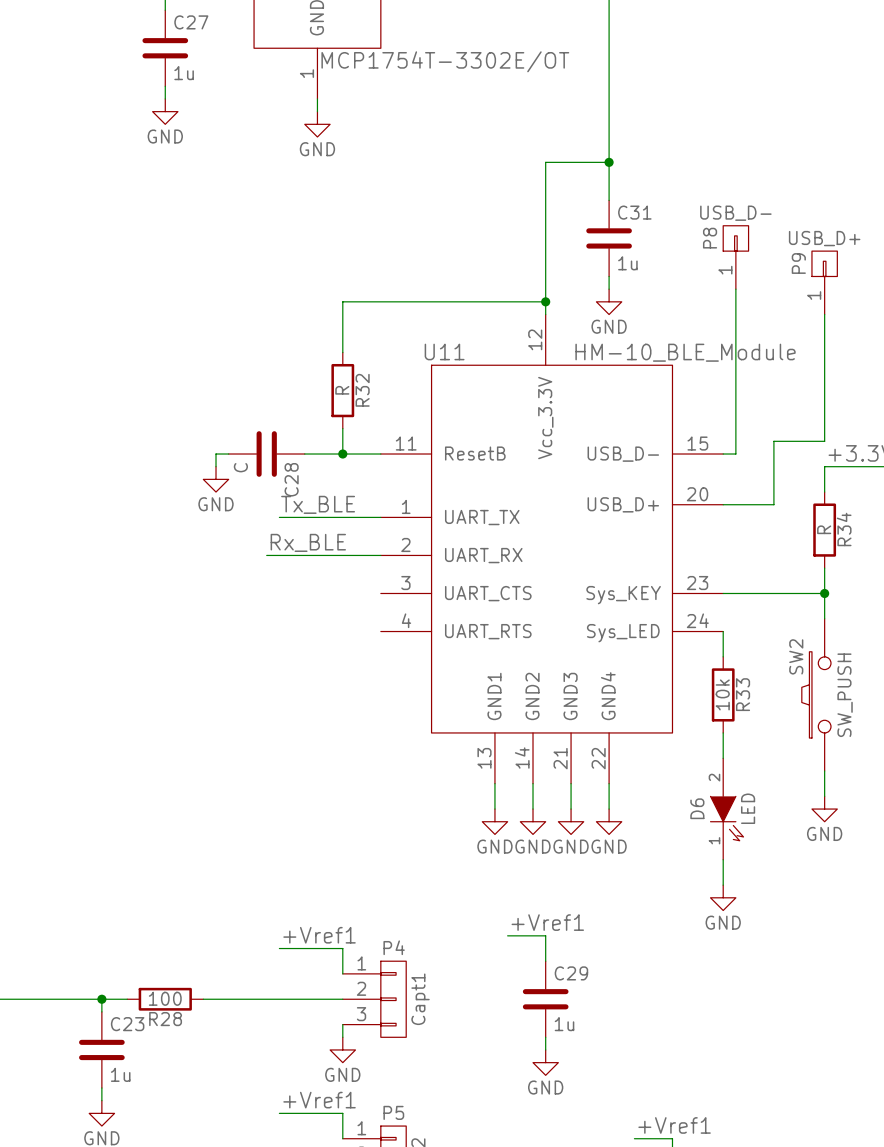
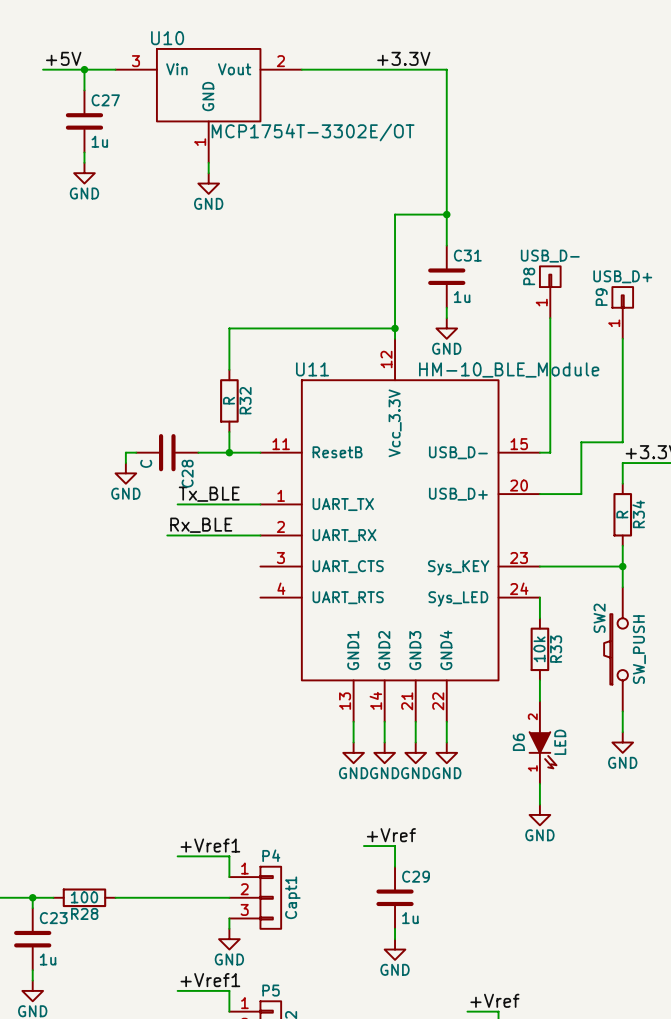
label: +Vref1 (547, 922) -> +Vref (391, 835)
label: +Vref1 (674, 1125) -> +Vref (494, 1000)

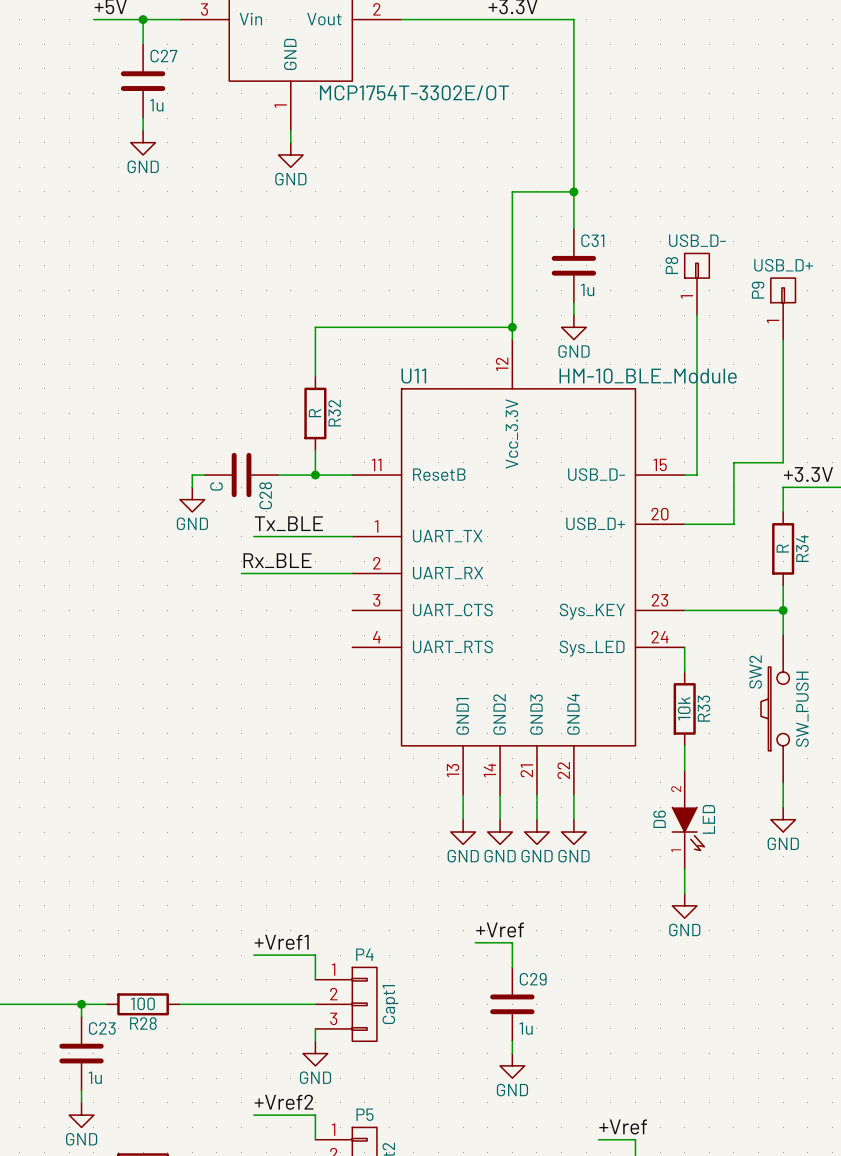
label: +Vref1 (210, 980) -> +Vref2 (284, 1102)

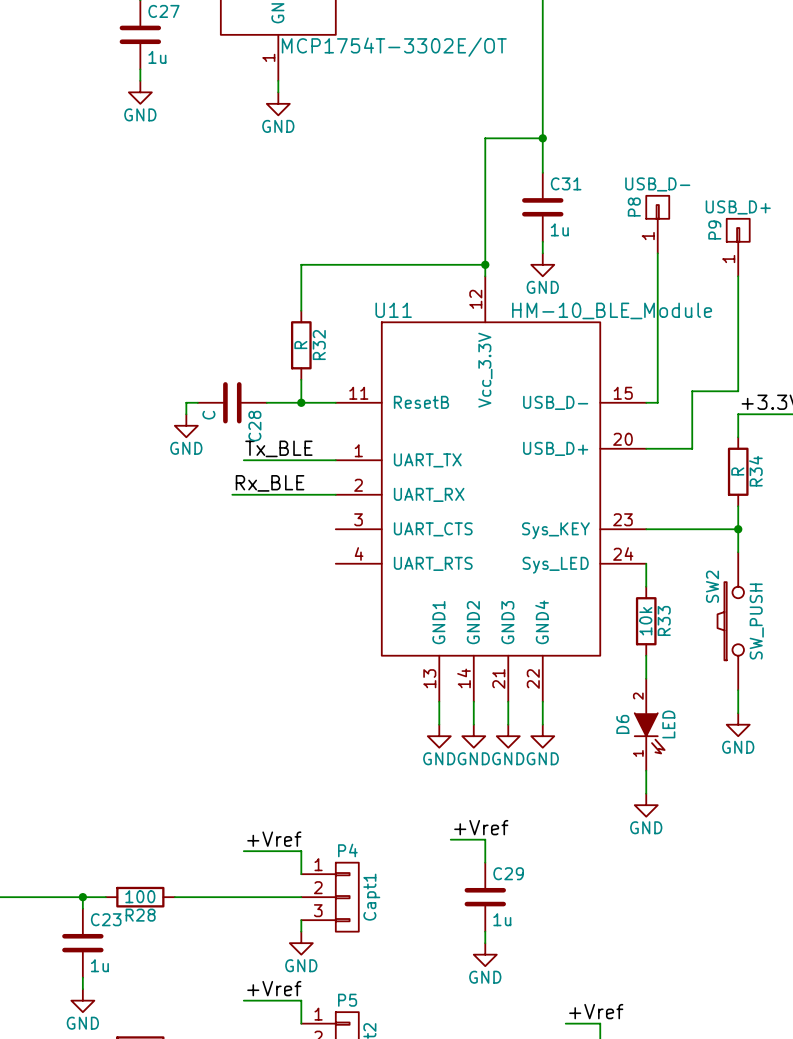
label: +Vref1 (281, 942) -> +Vref (274, 839)
label: +Vref2 (284, 1102) -> +Vref (274, 988)

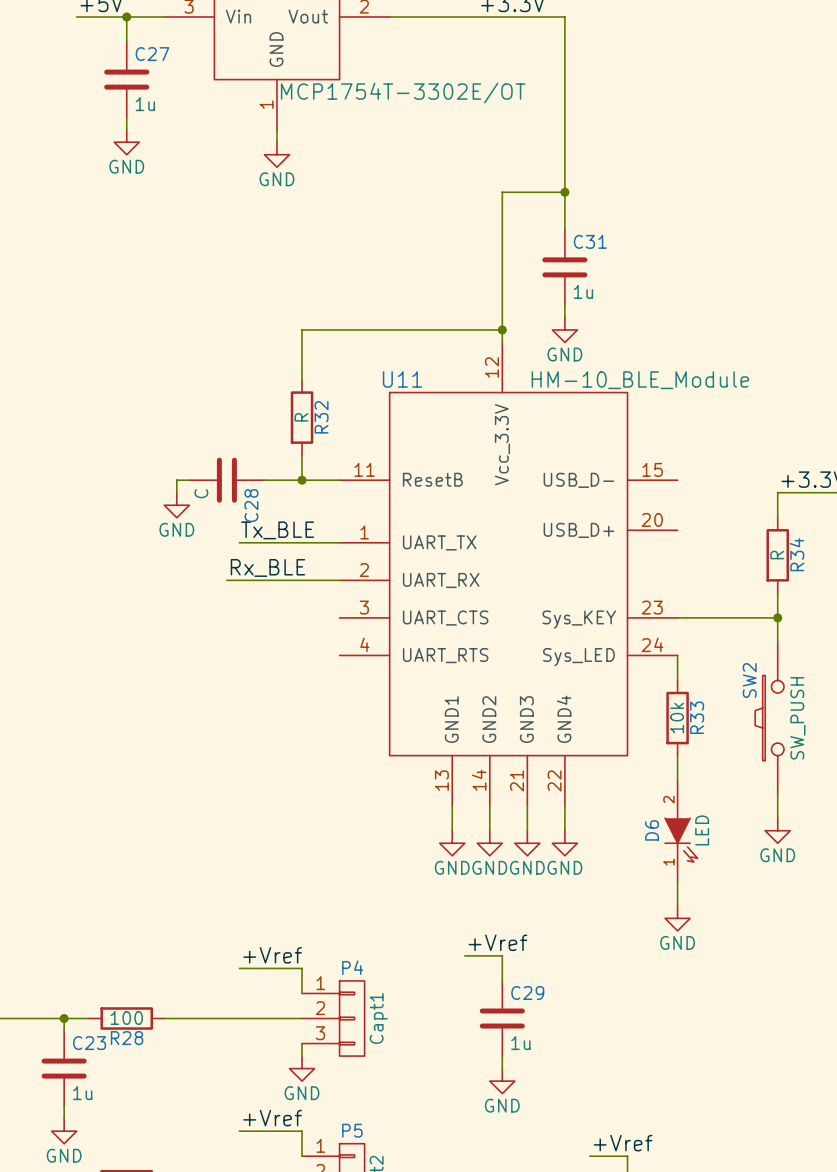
P8: USB_D- (657, 224) -> none
P9: USB_D+ (738, 247) -> none
wire: (657, 253) (657, 402) (646, 402) -> none
wire: (738, 276) (738, 391) (692, 391) (692, 448) (646, 448) -> none

